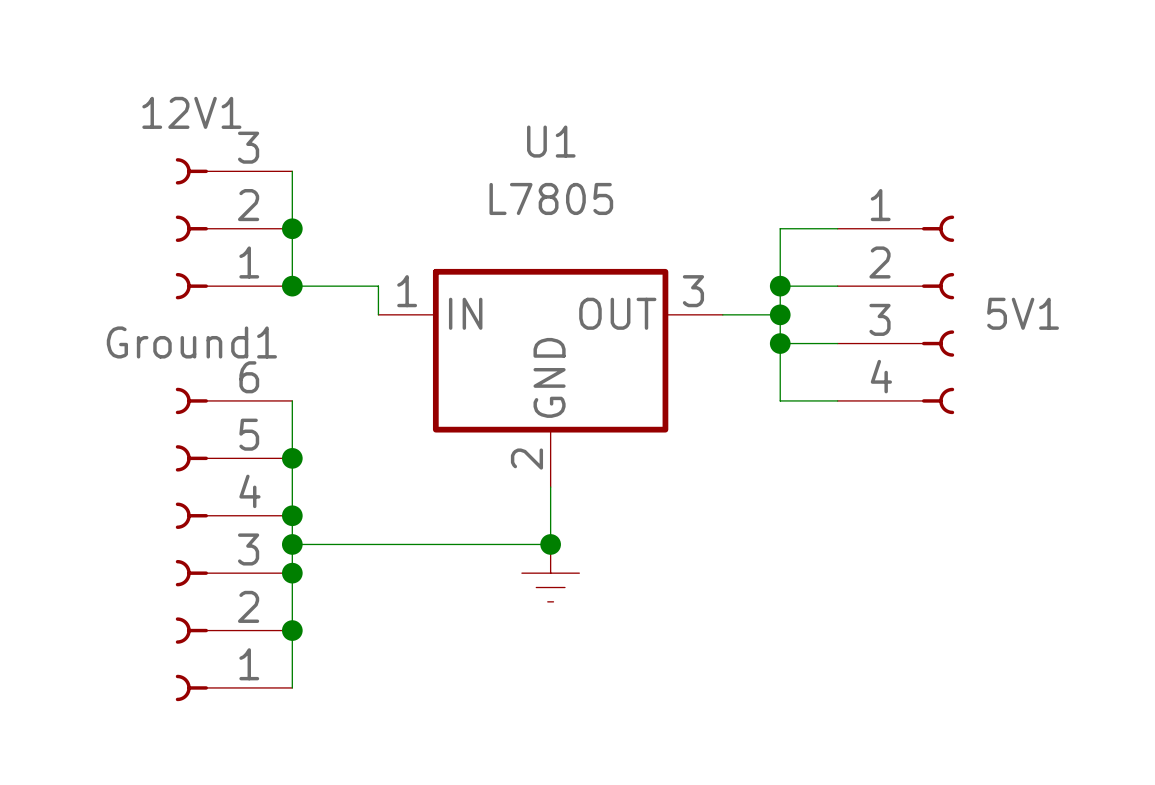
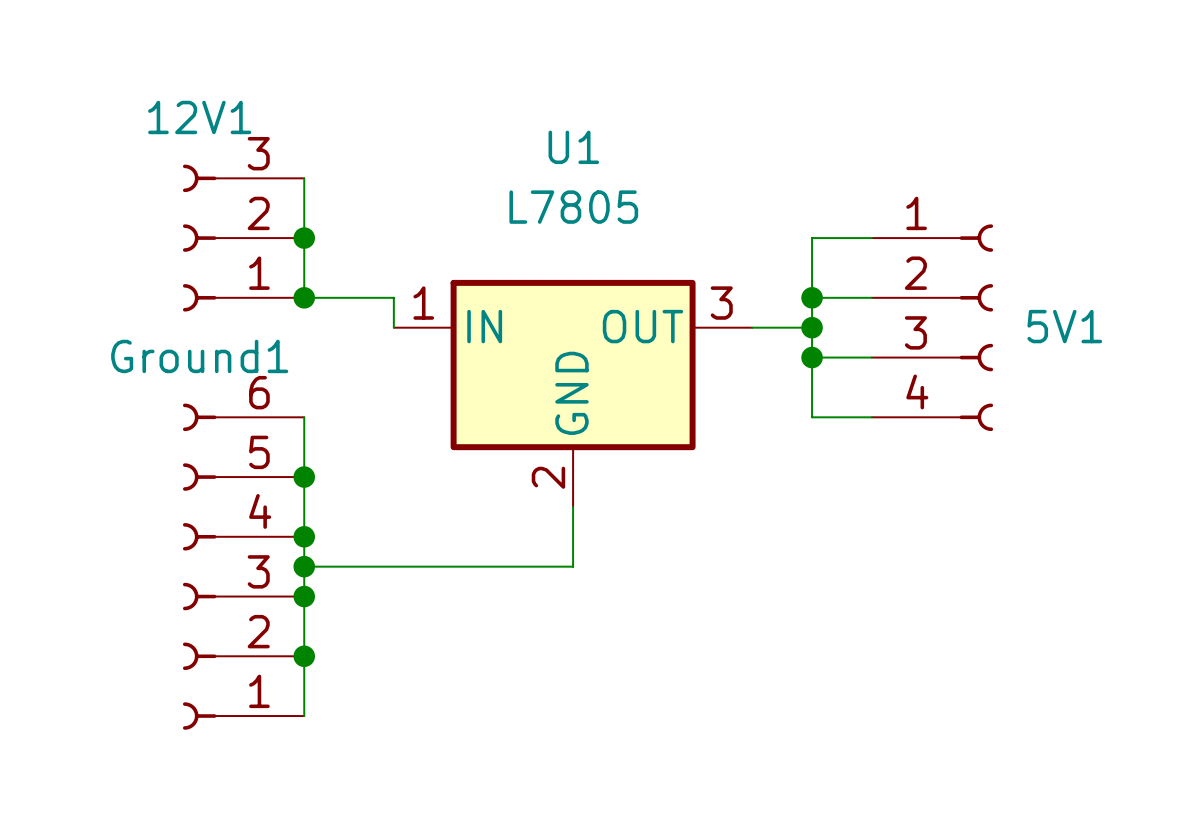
junction: (550, 544) -> none
power symbol: (550, 573) -> none

